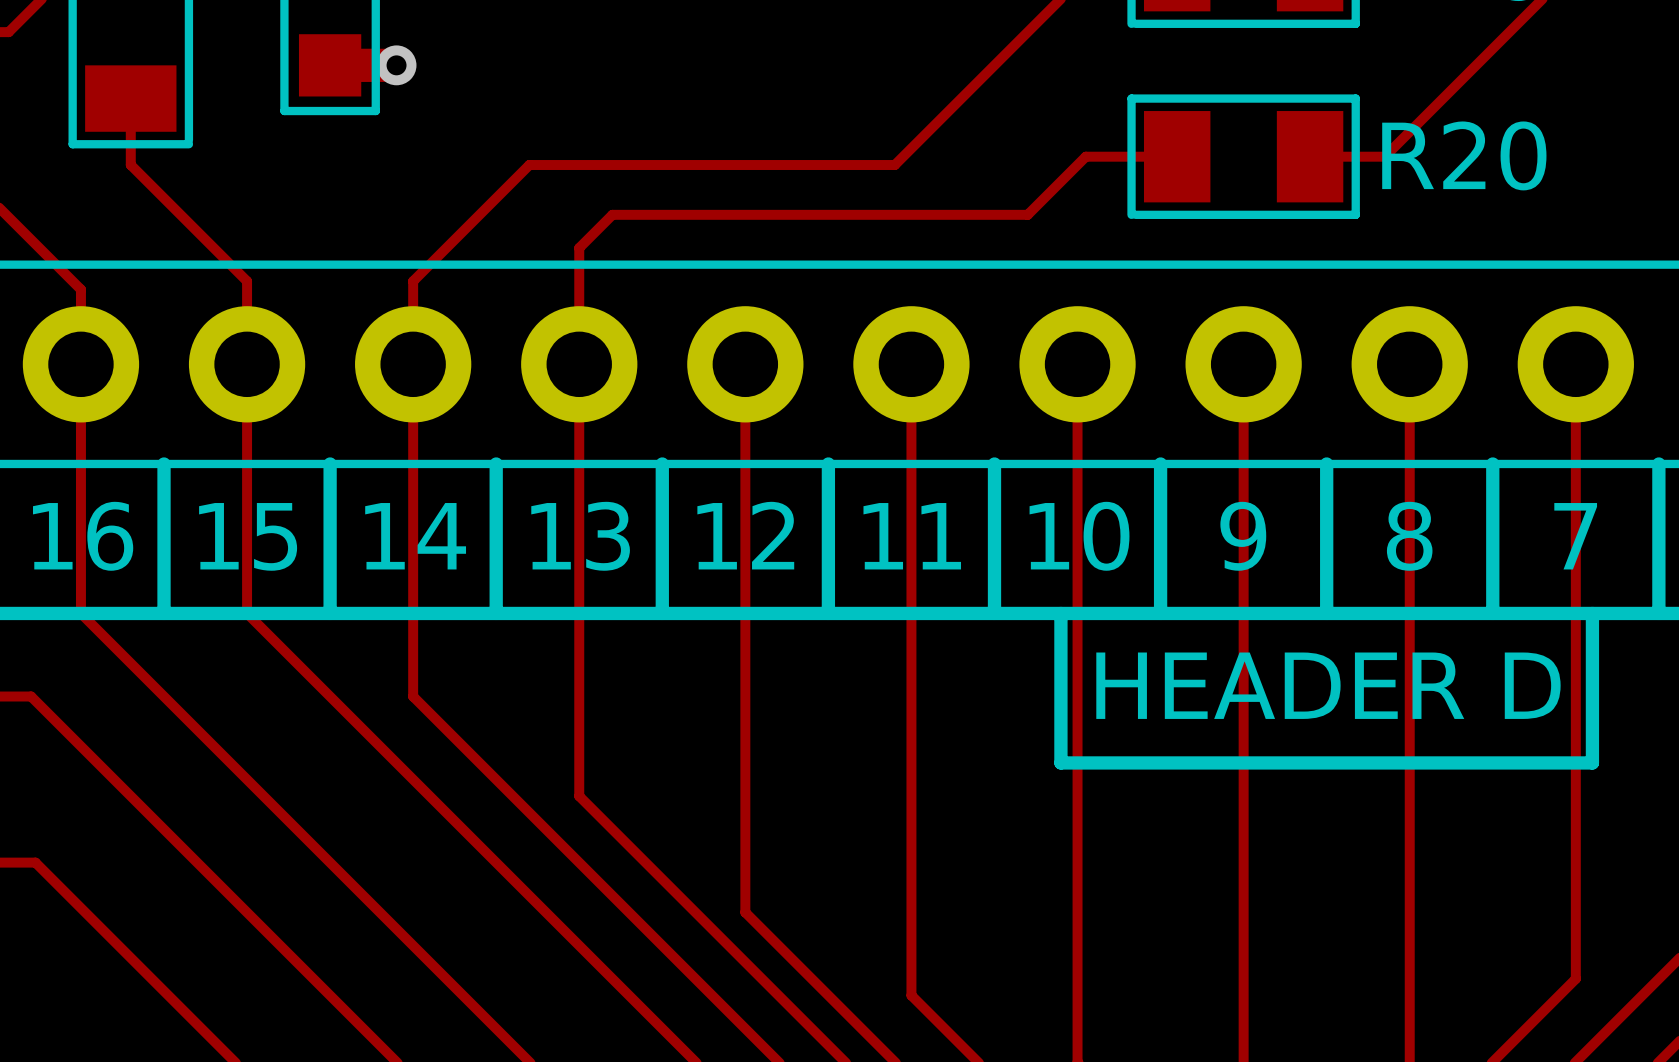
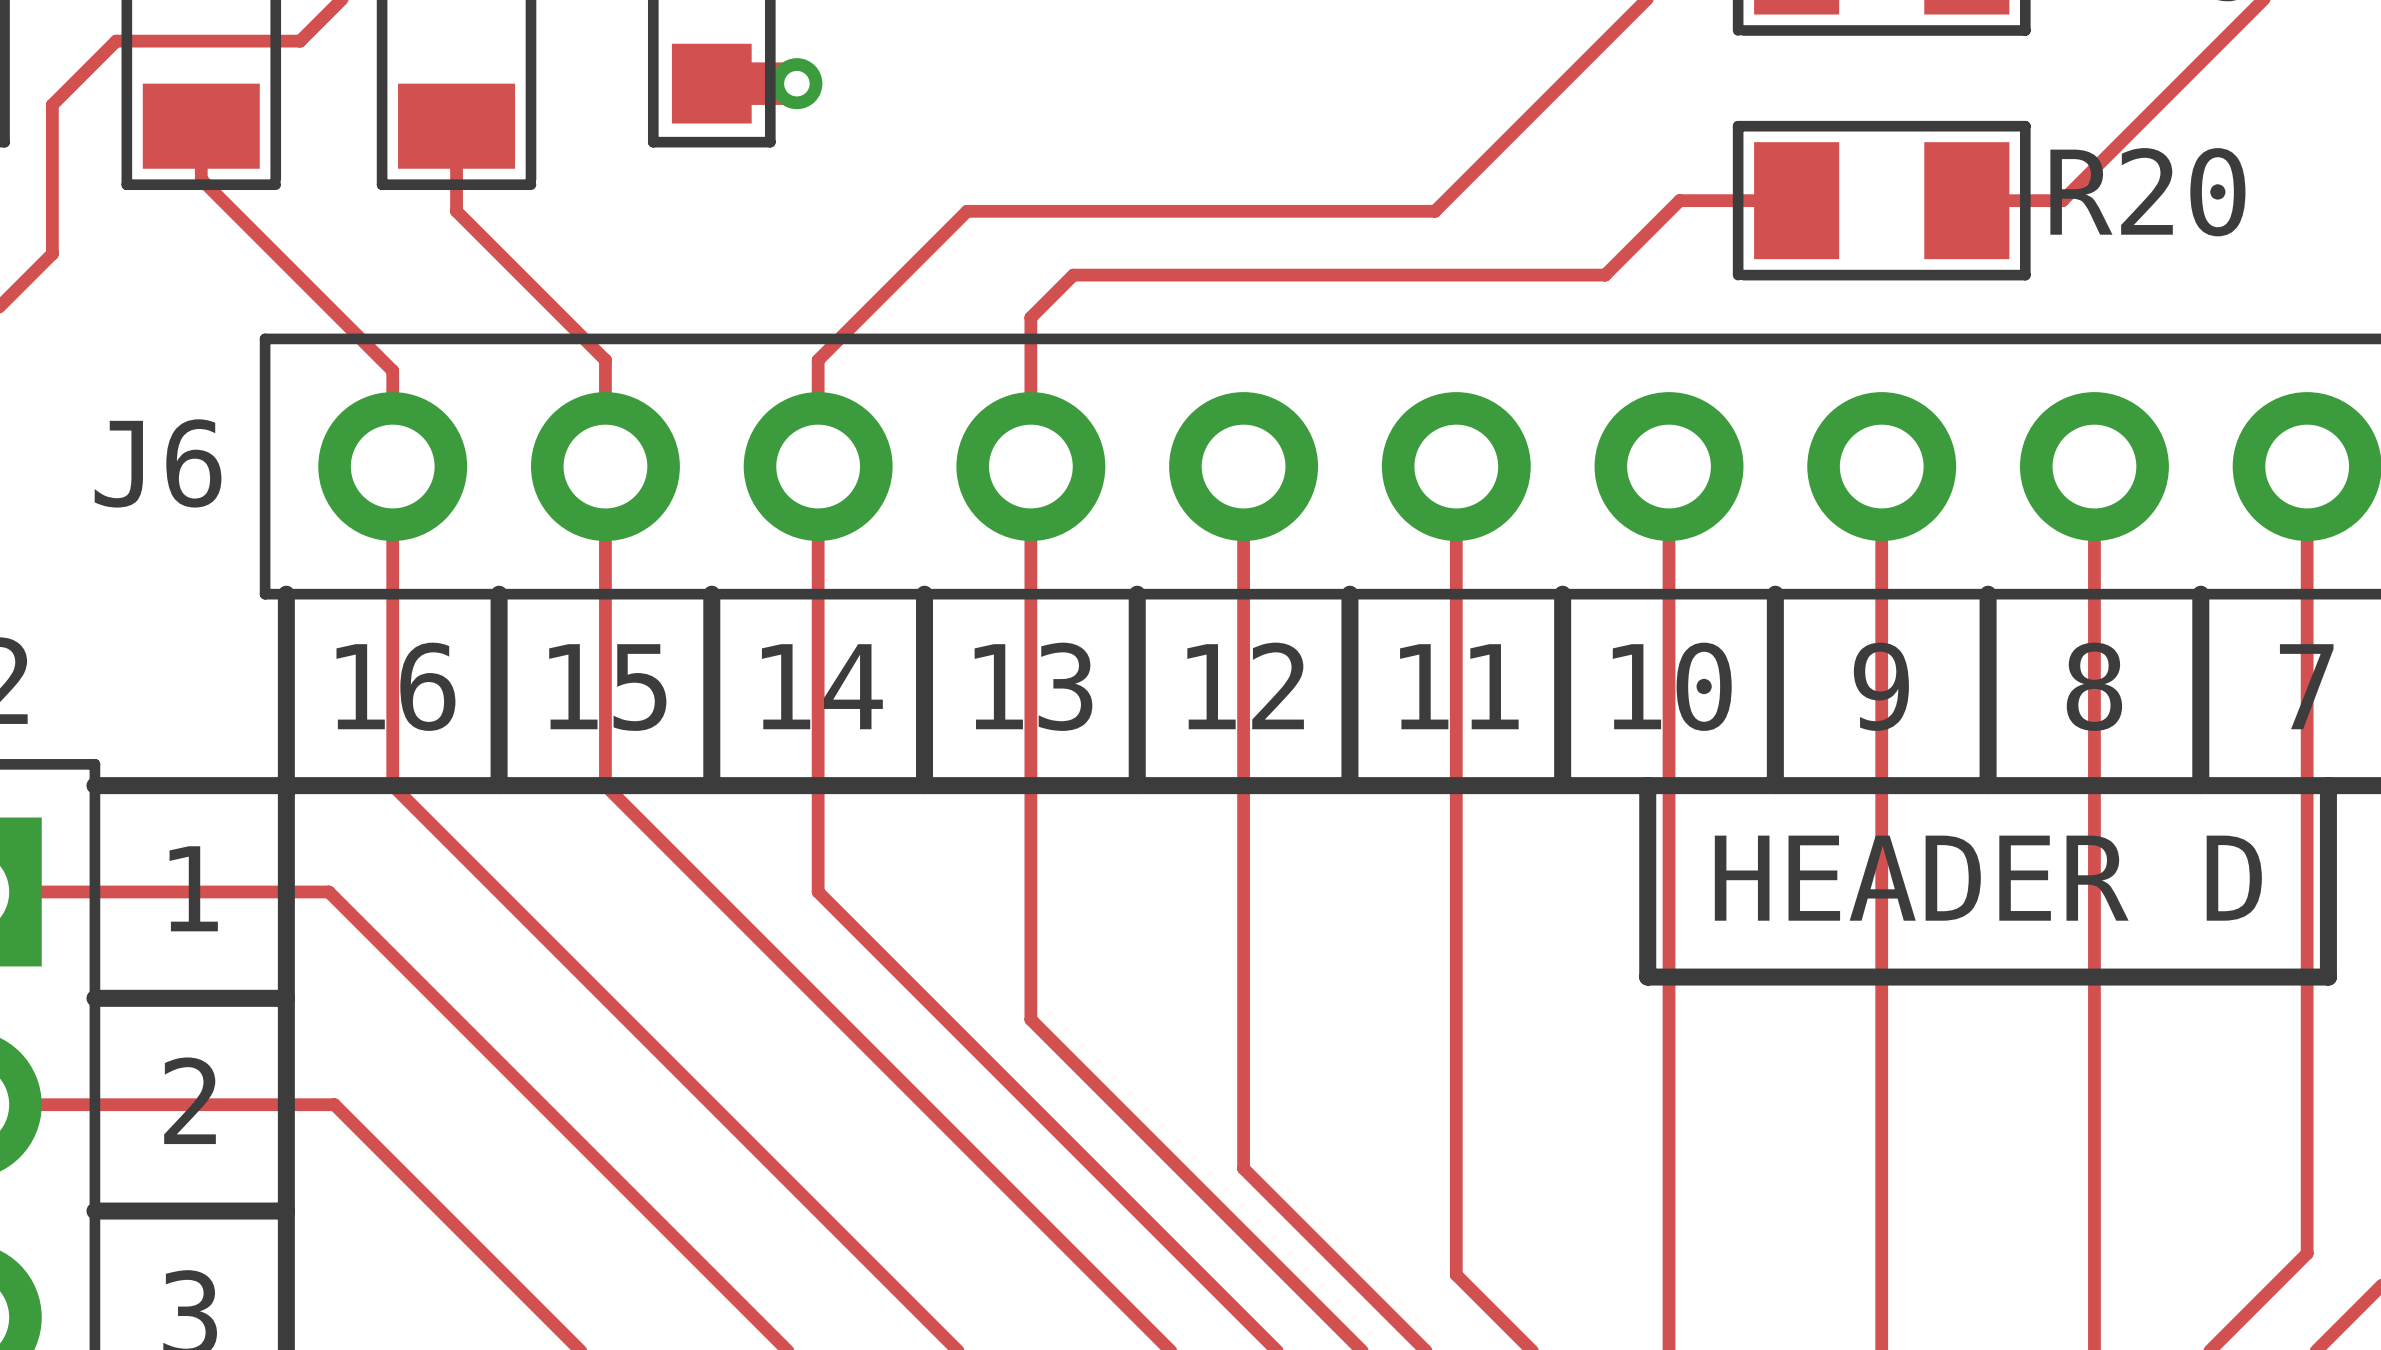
R20 name position: R20 (1464, 155) -> R20 (2147, 192)

